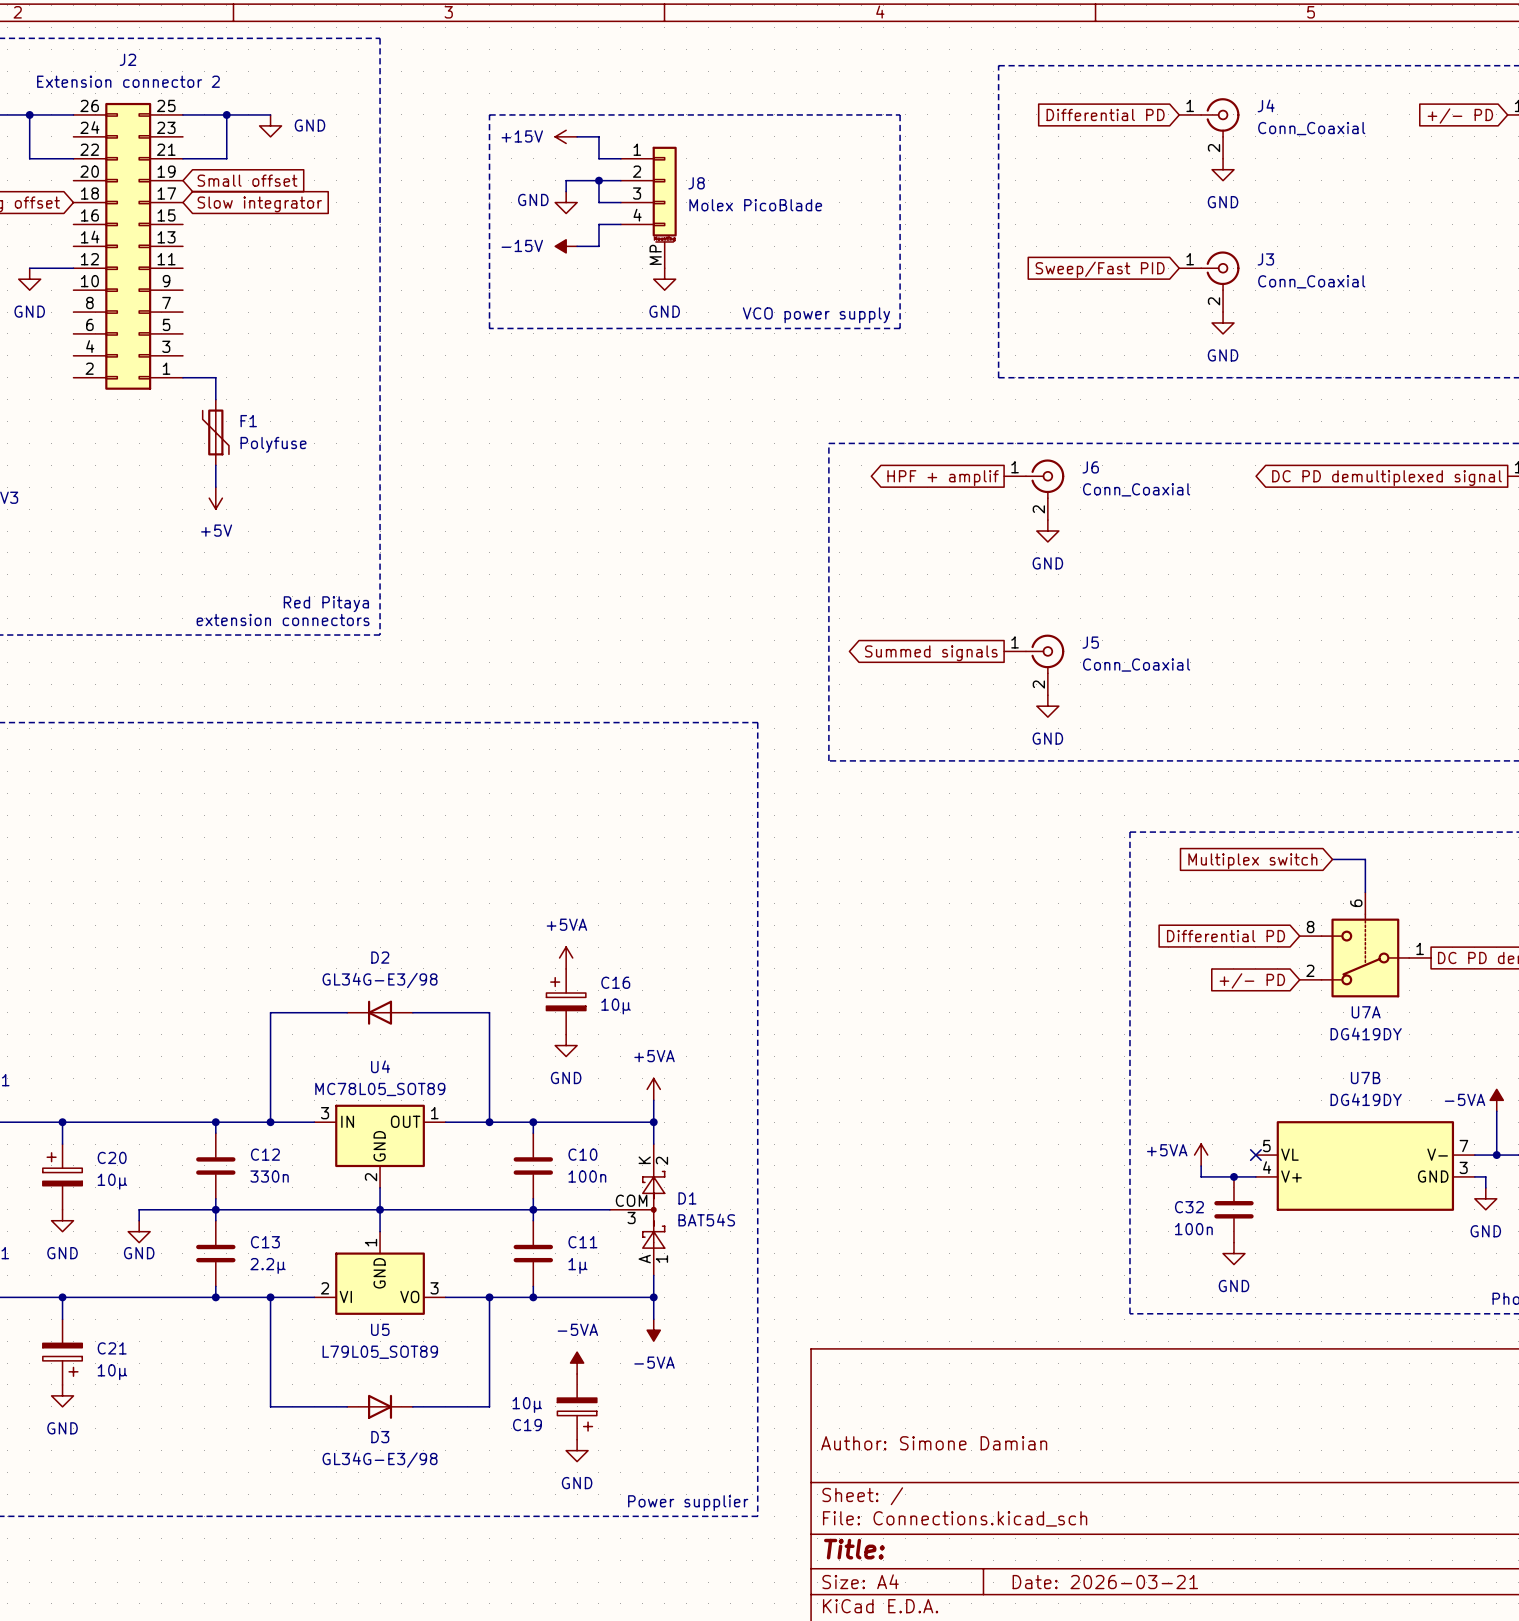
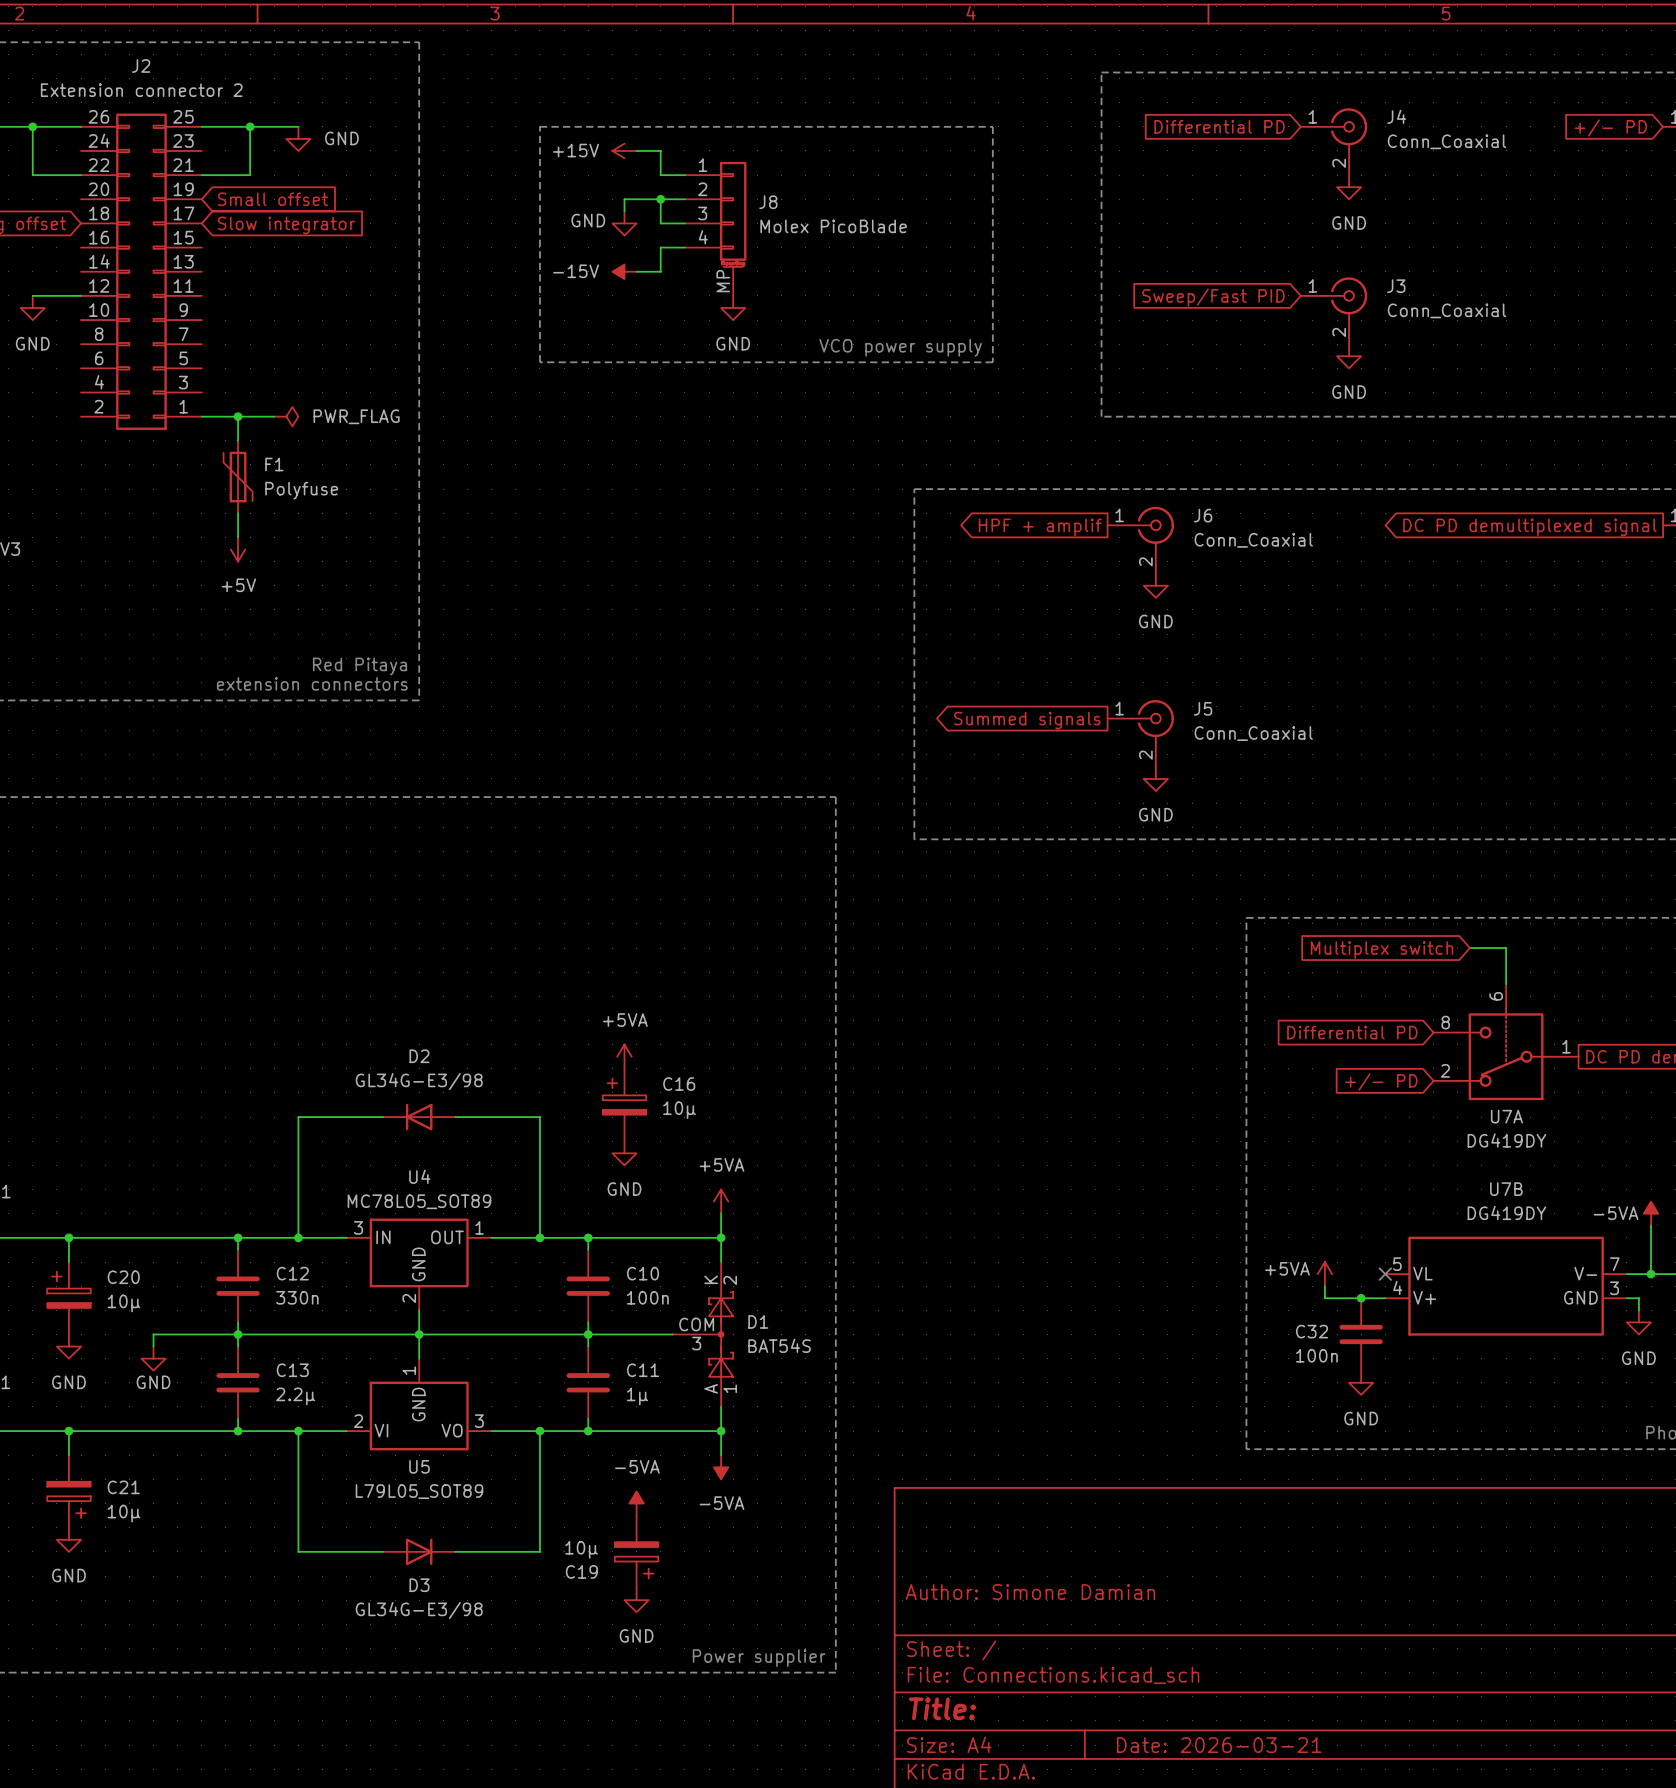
wire: none -> (238, 416) (274, 416)
junction: none -> (238, 416)
power symbol: none -> PWR_FLAG (286, 416)

